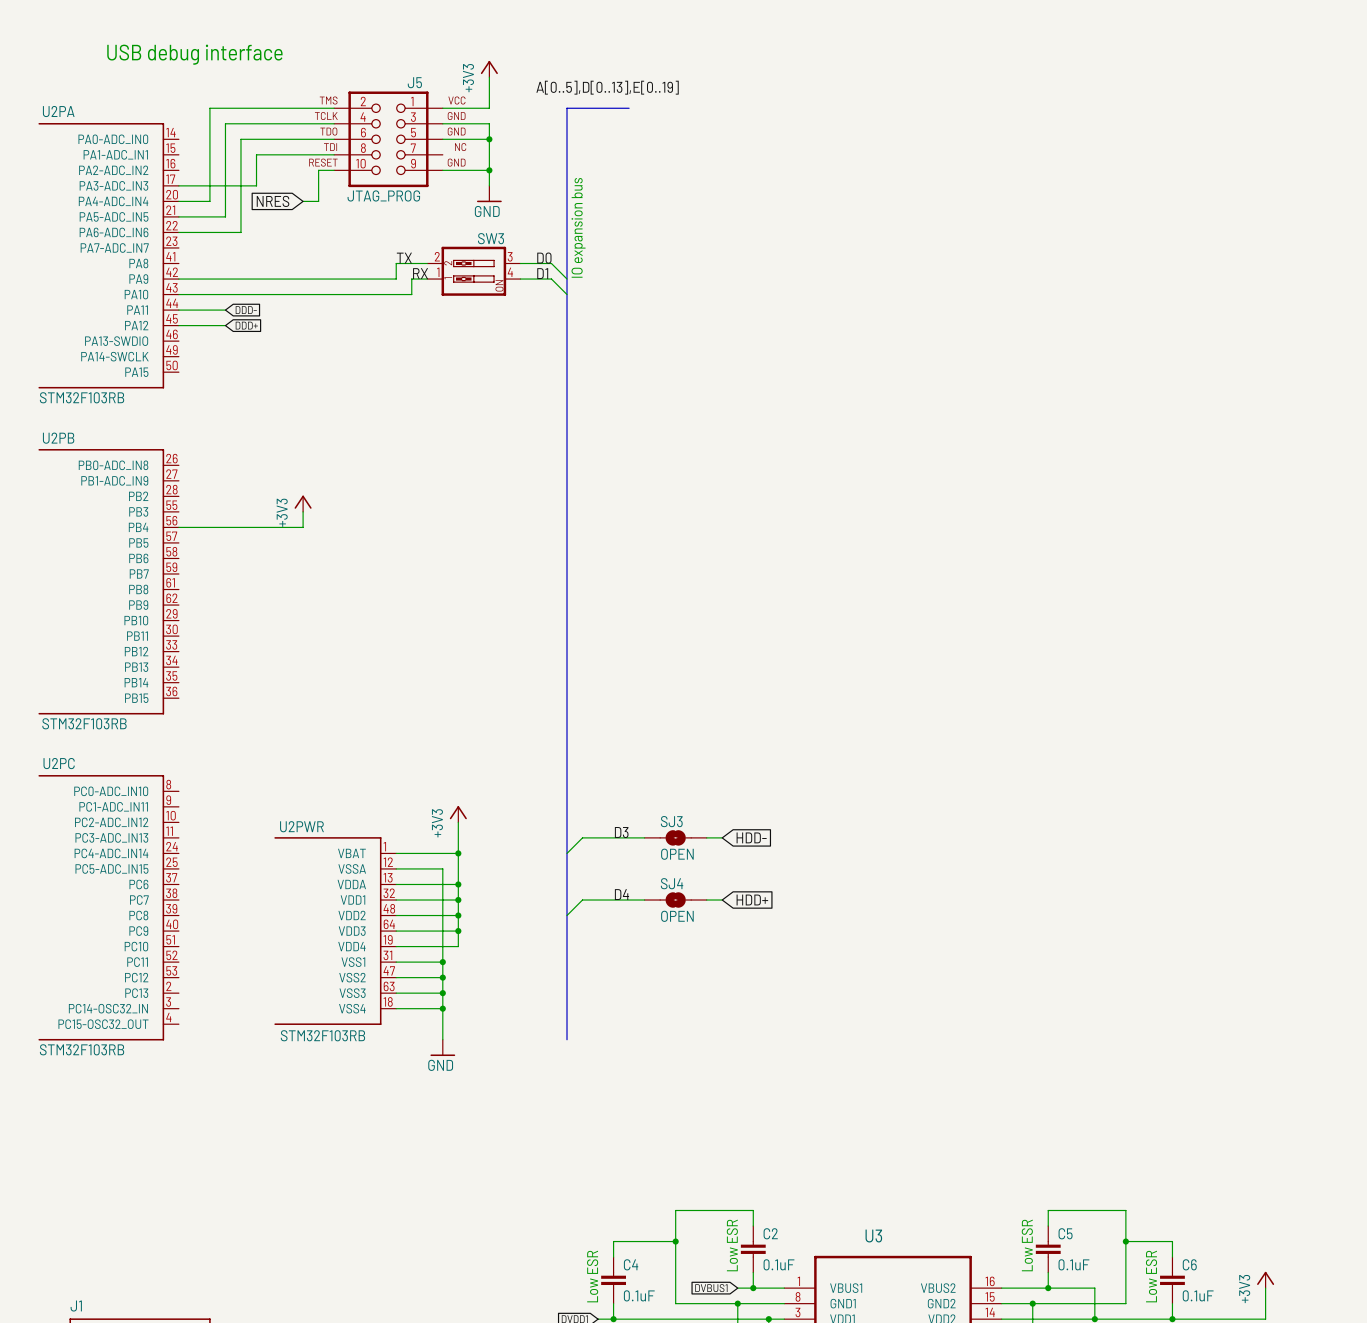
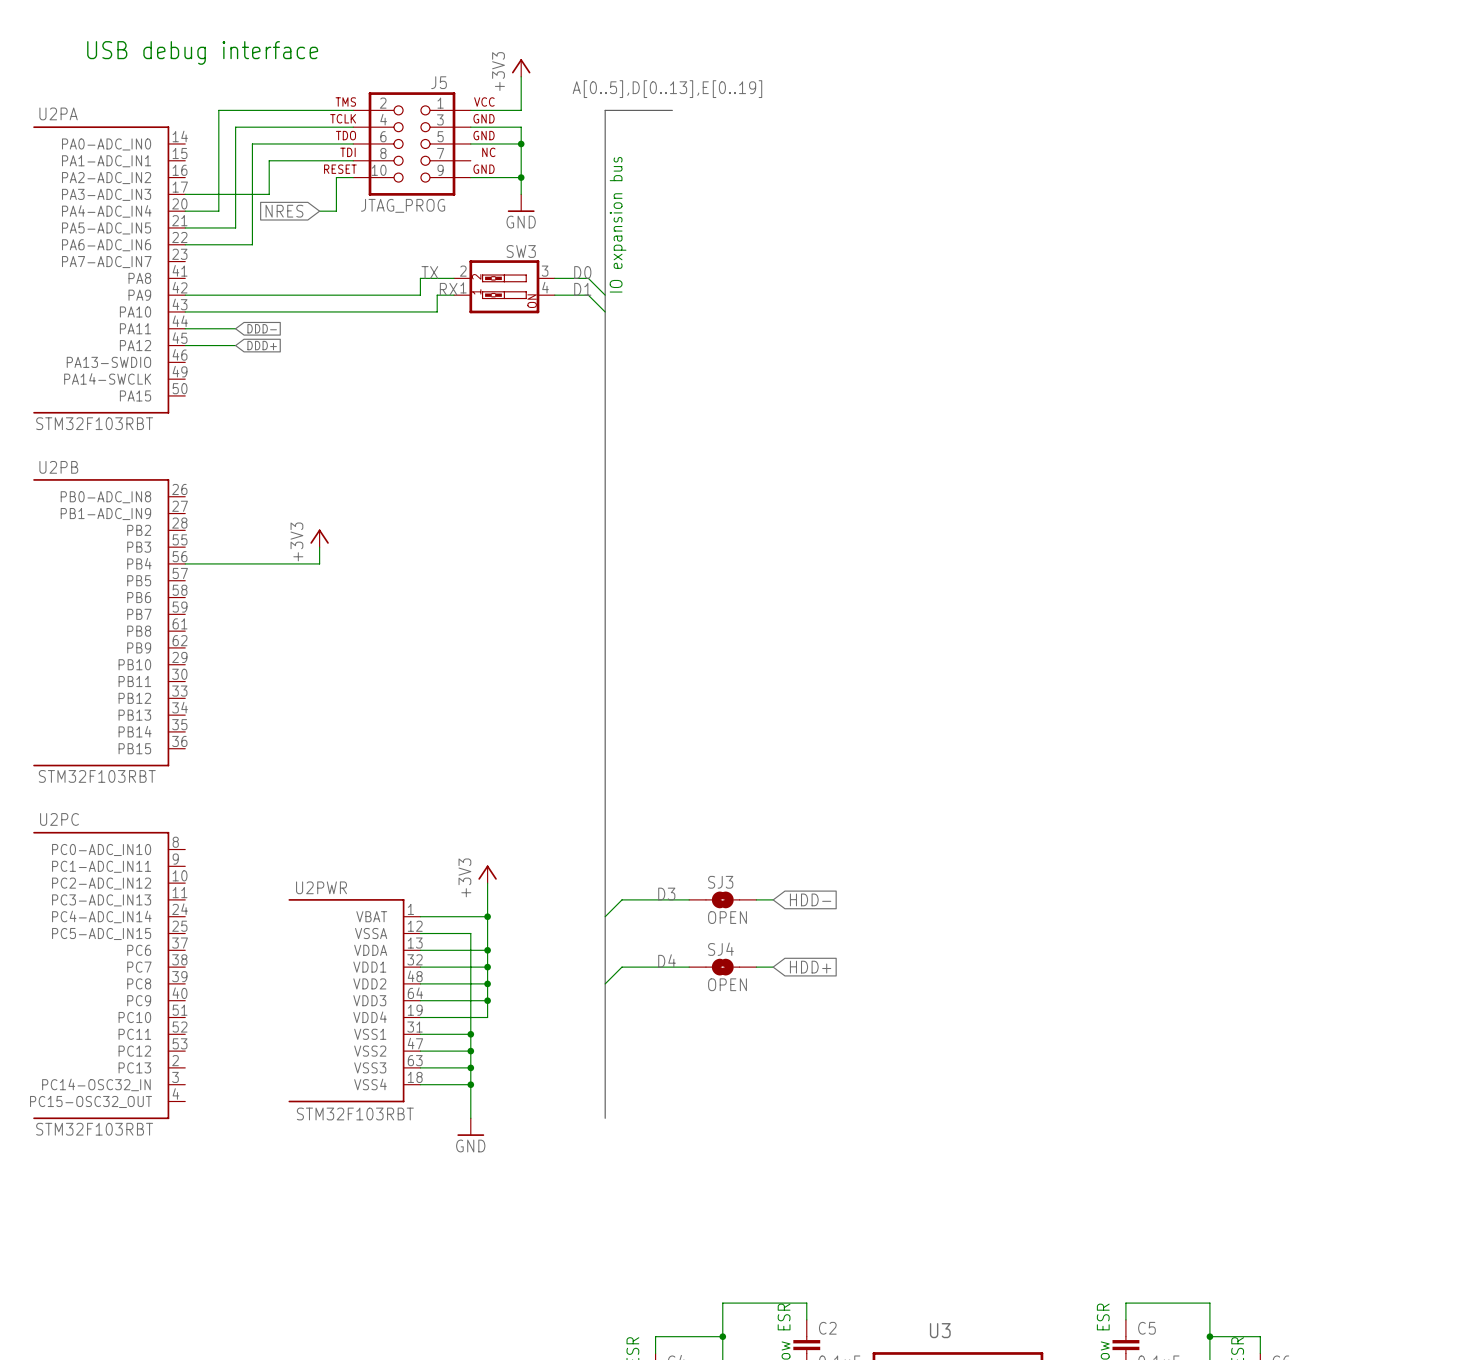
U2PA value: STM32F103RB (82, 397) -> STM32F103RBT (94, 423)
U2PB value: STM32F103RB (84, 723) -> STM32F103RBT (97, 776)
U2PWR value: STM32F103RB (322, 1035) -> STM32F103RBT (355, 1114)
U2PC value: STM32F103RB (82, 1049) -> STM32F103RBT (94, 1129)

